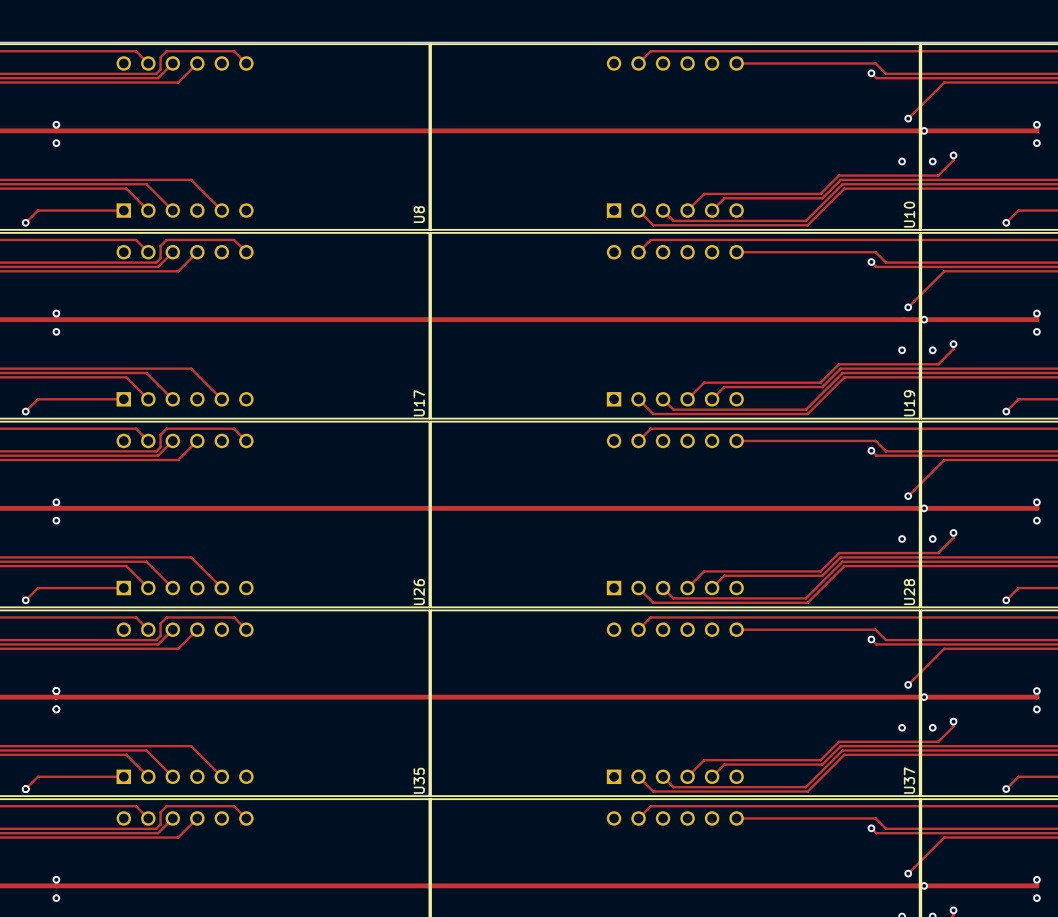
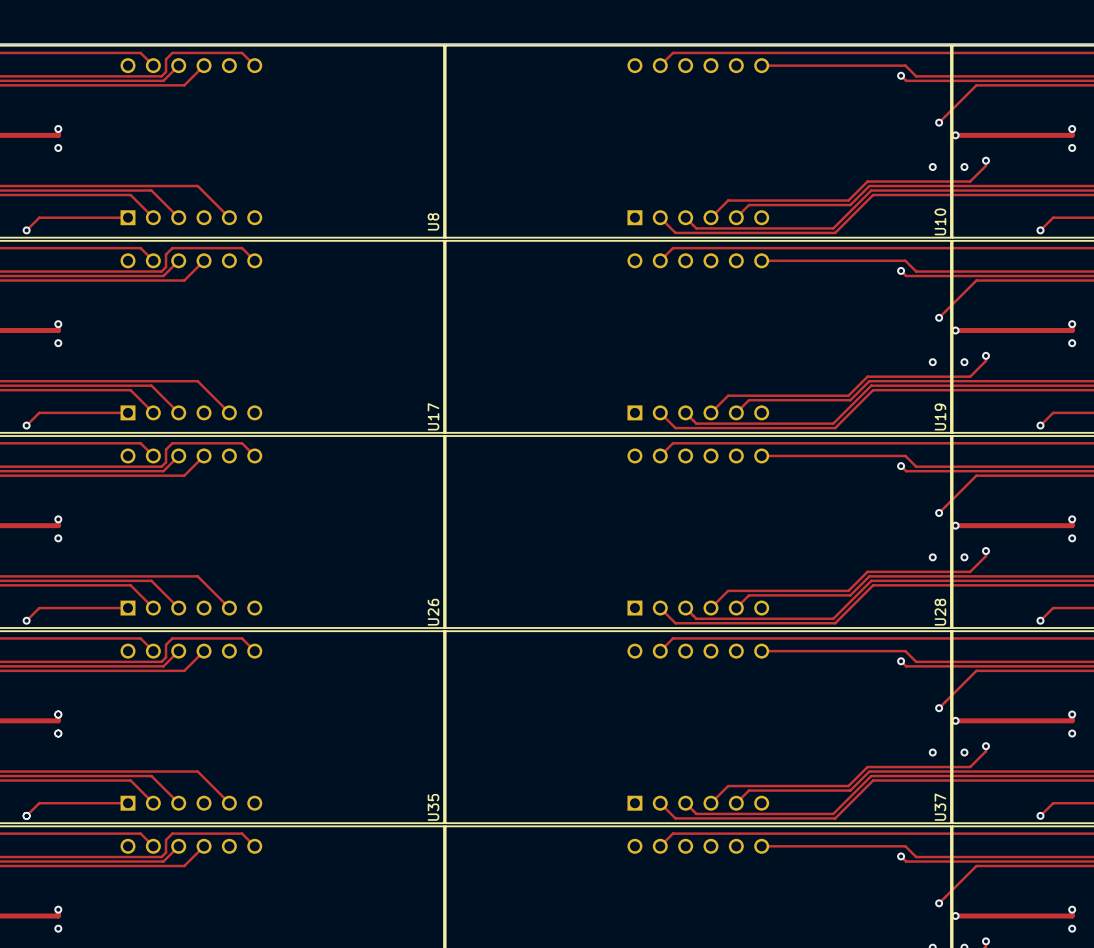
track: (56, 130) (924, 130) -> none
track: (56, 319) (924, 319) -> none
track: (56, 508) (924, 508) -> none
track: (56, 697) (924, 697) -> none
track: (56, 885) (924, 885) -> none

